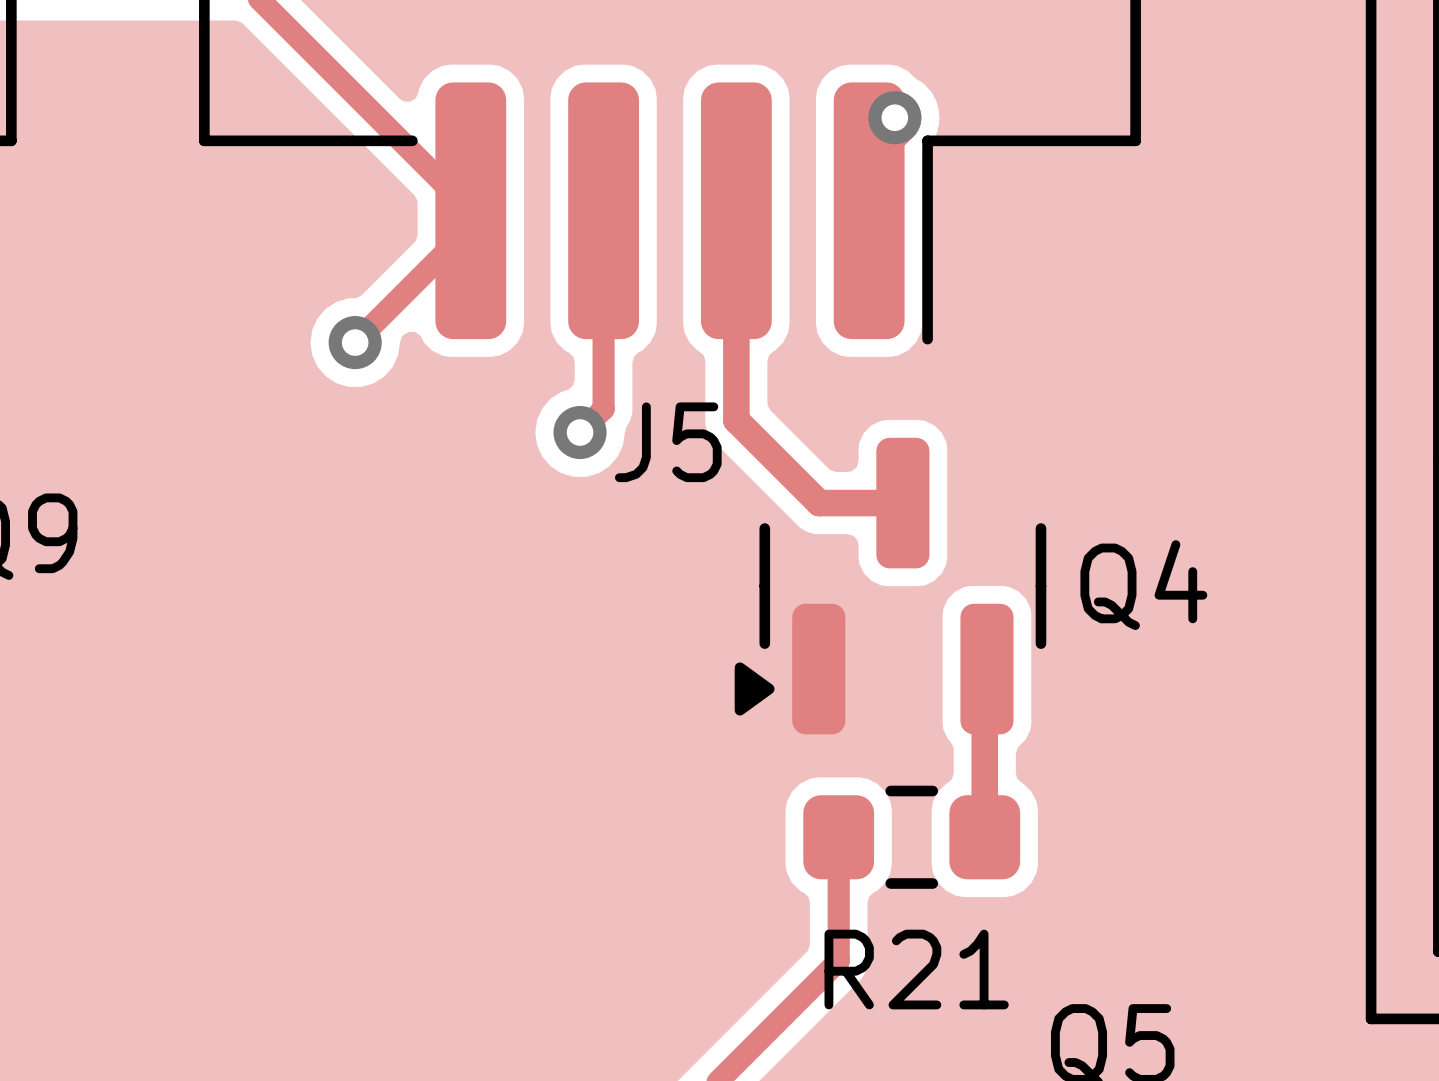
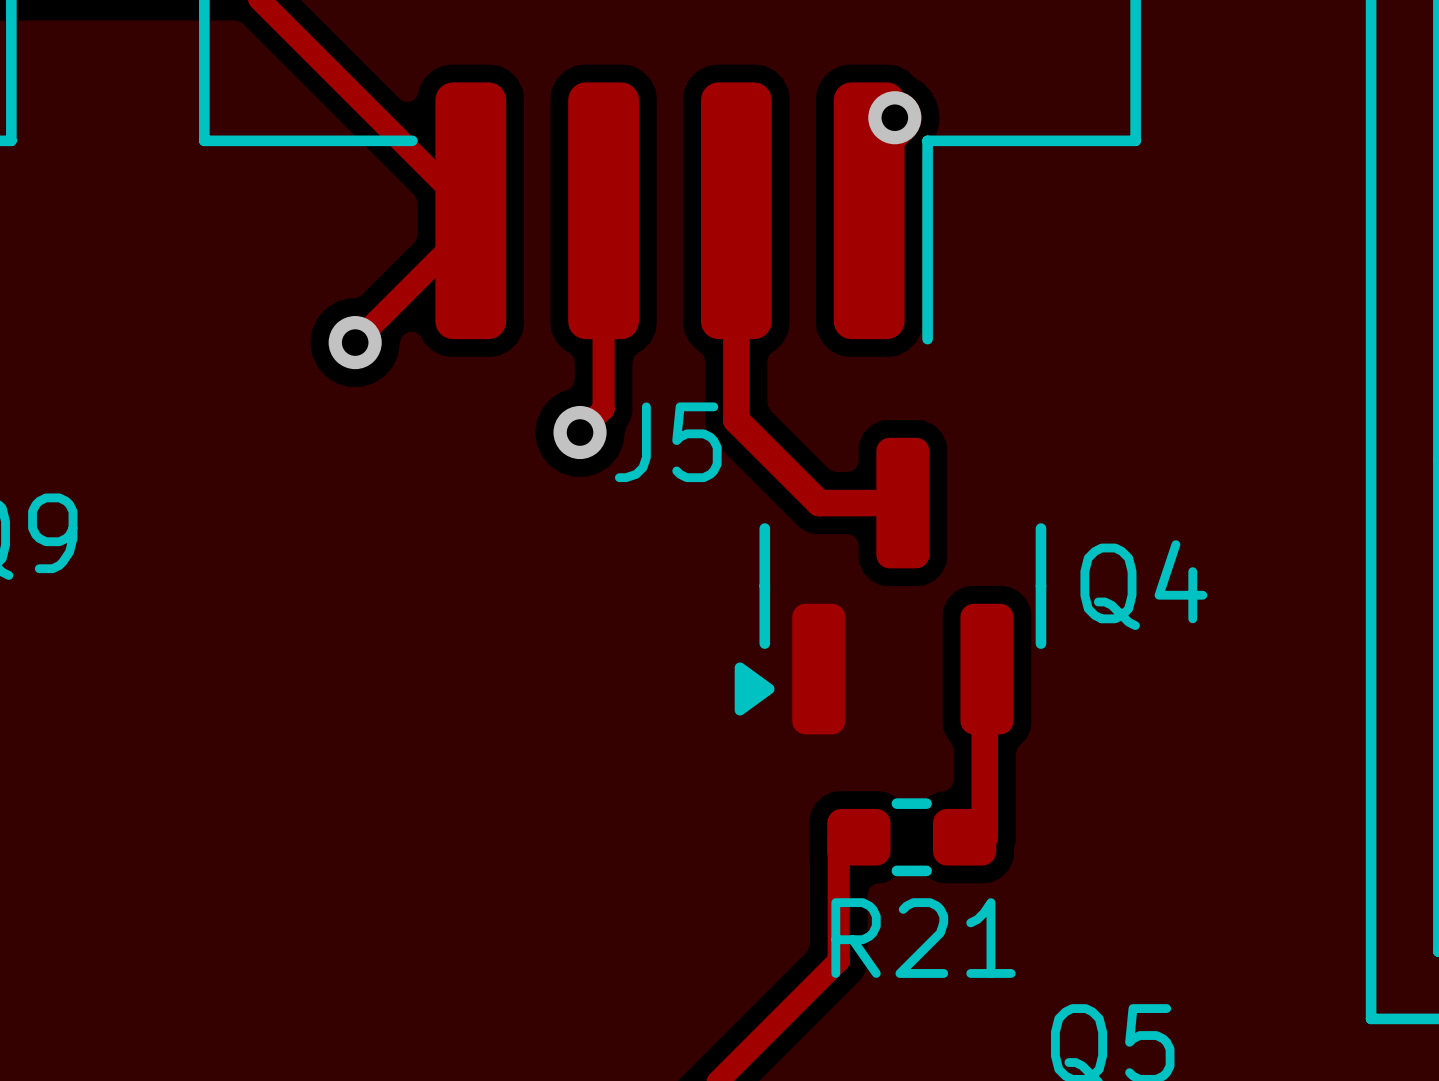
R21 footprint: [803, 785, 1021, 889] -> [827, 798, 997, 877]
R21 name position: R21 (916, 969) -> R21 (923, 938)

